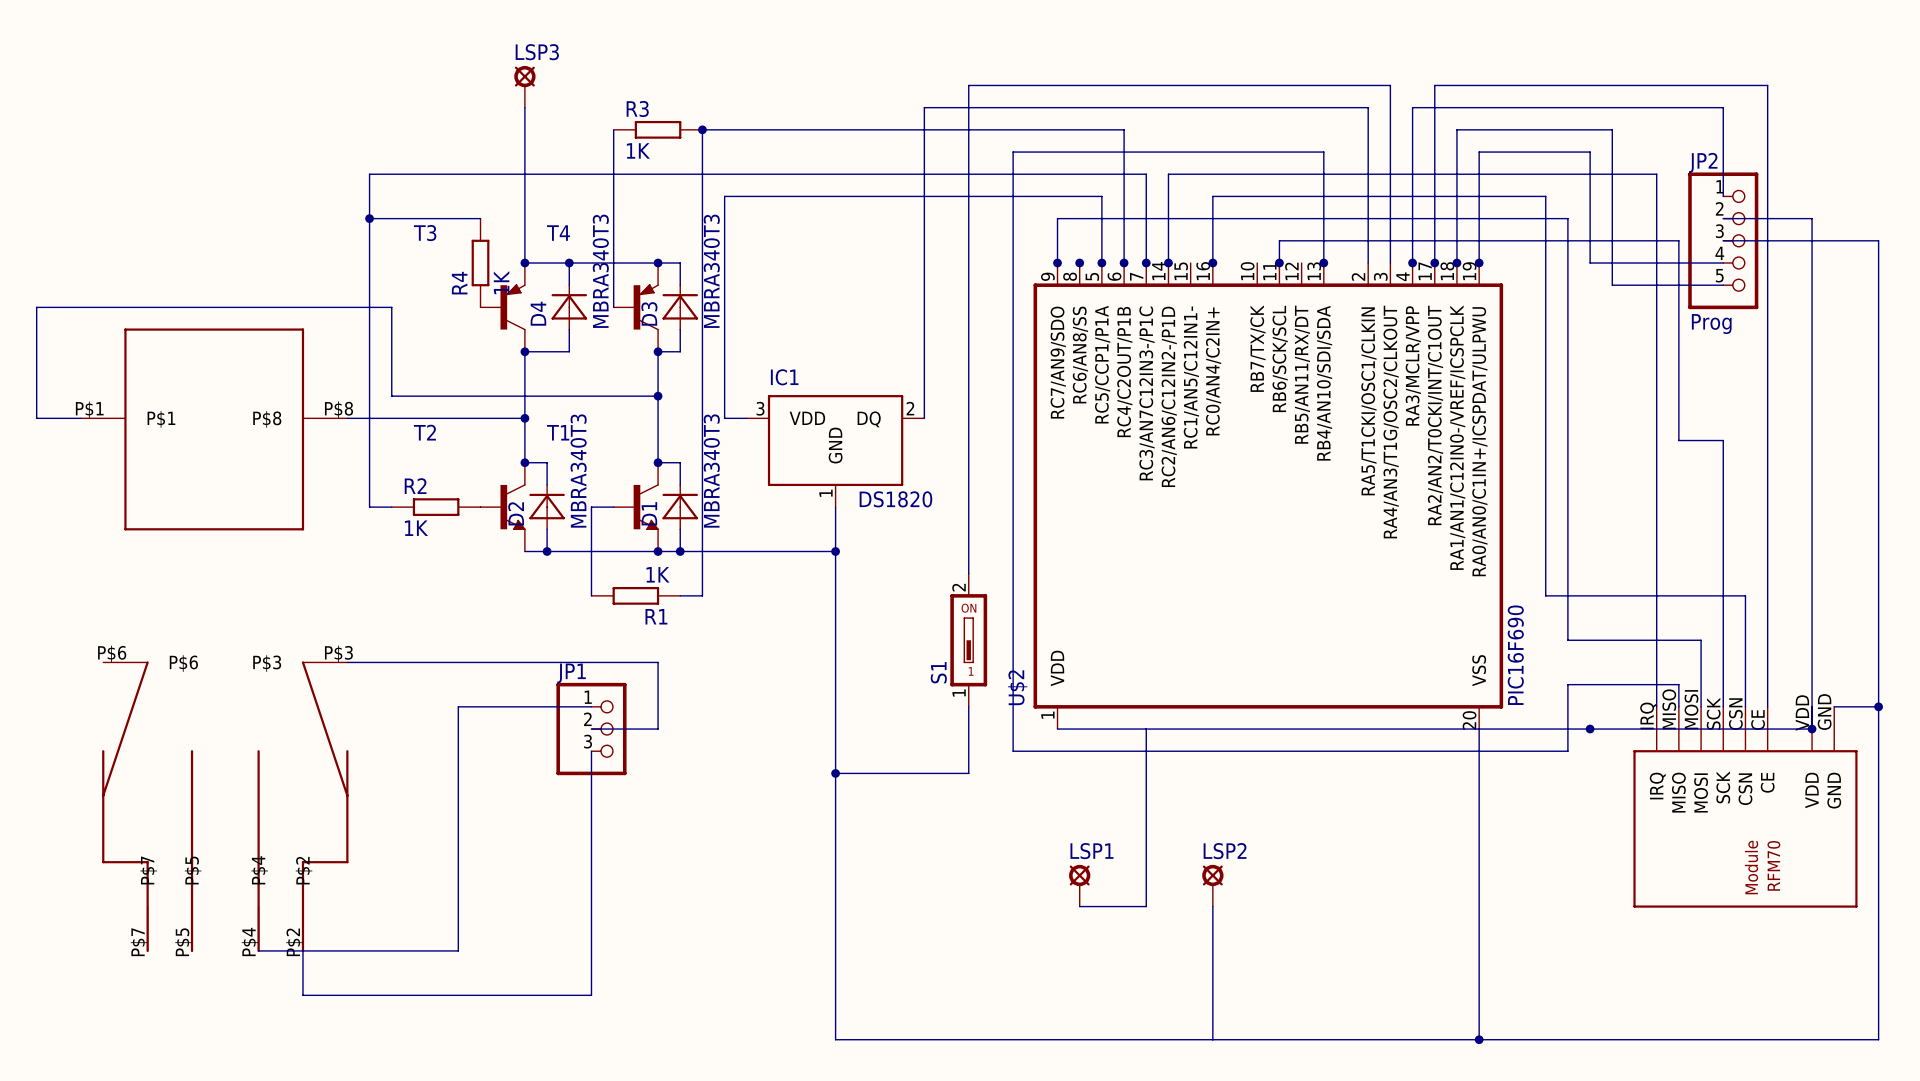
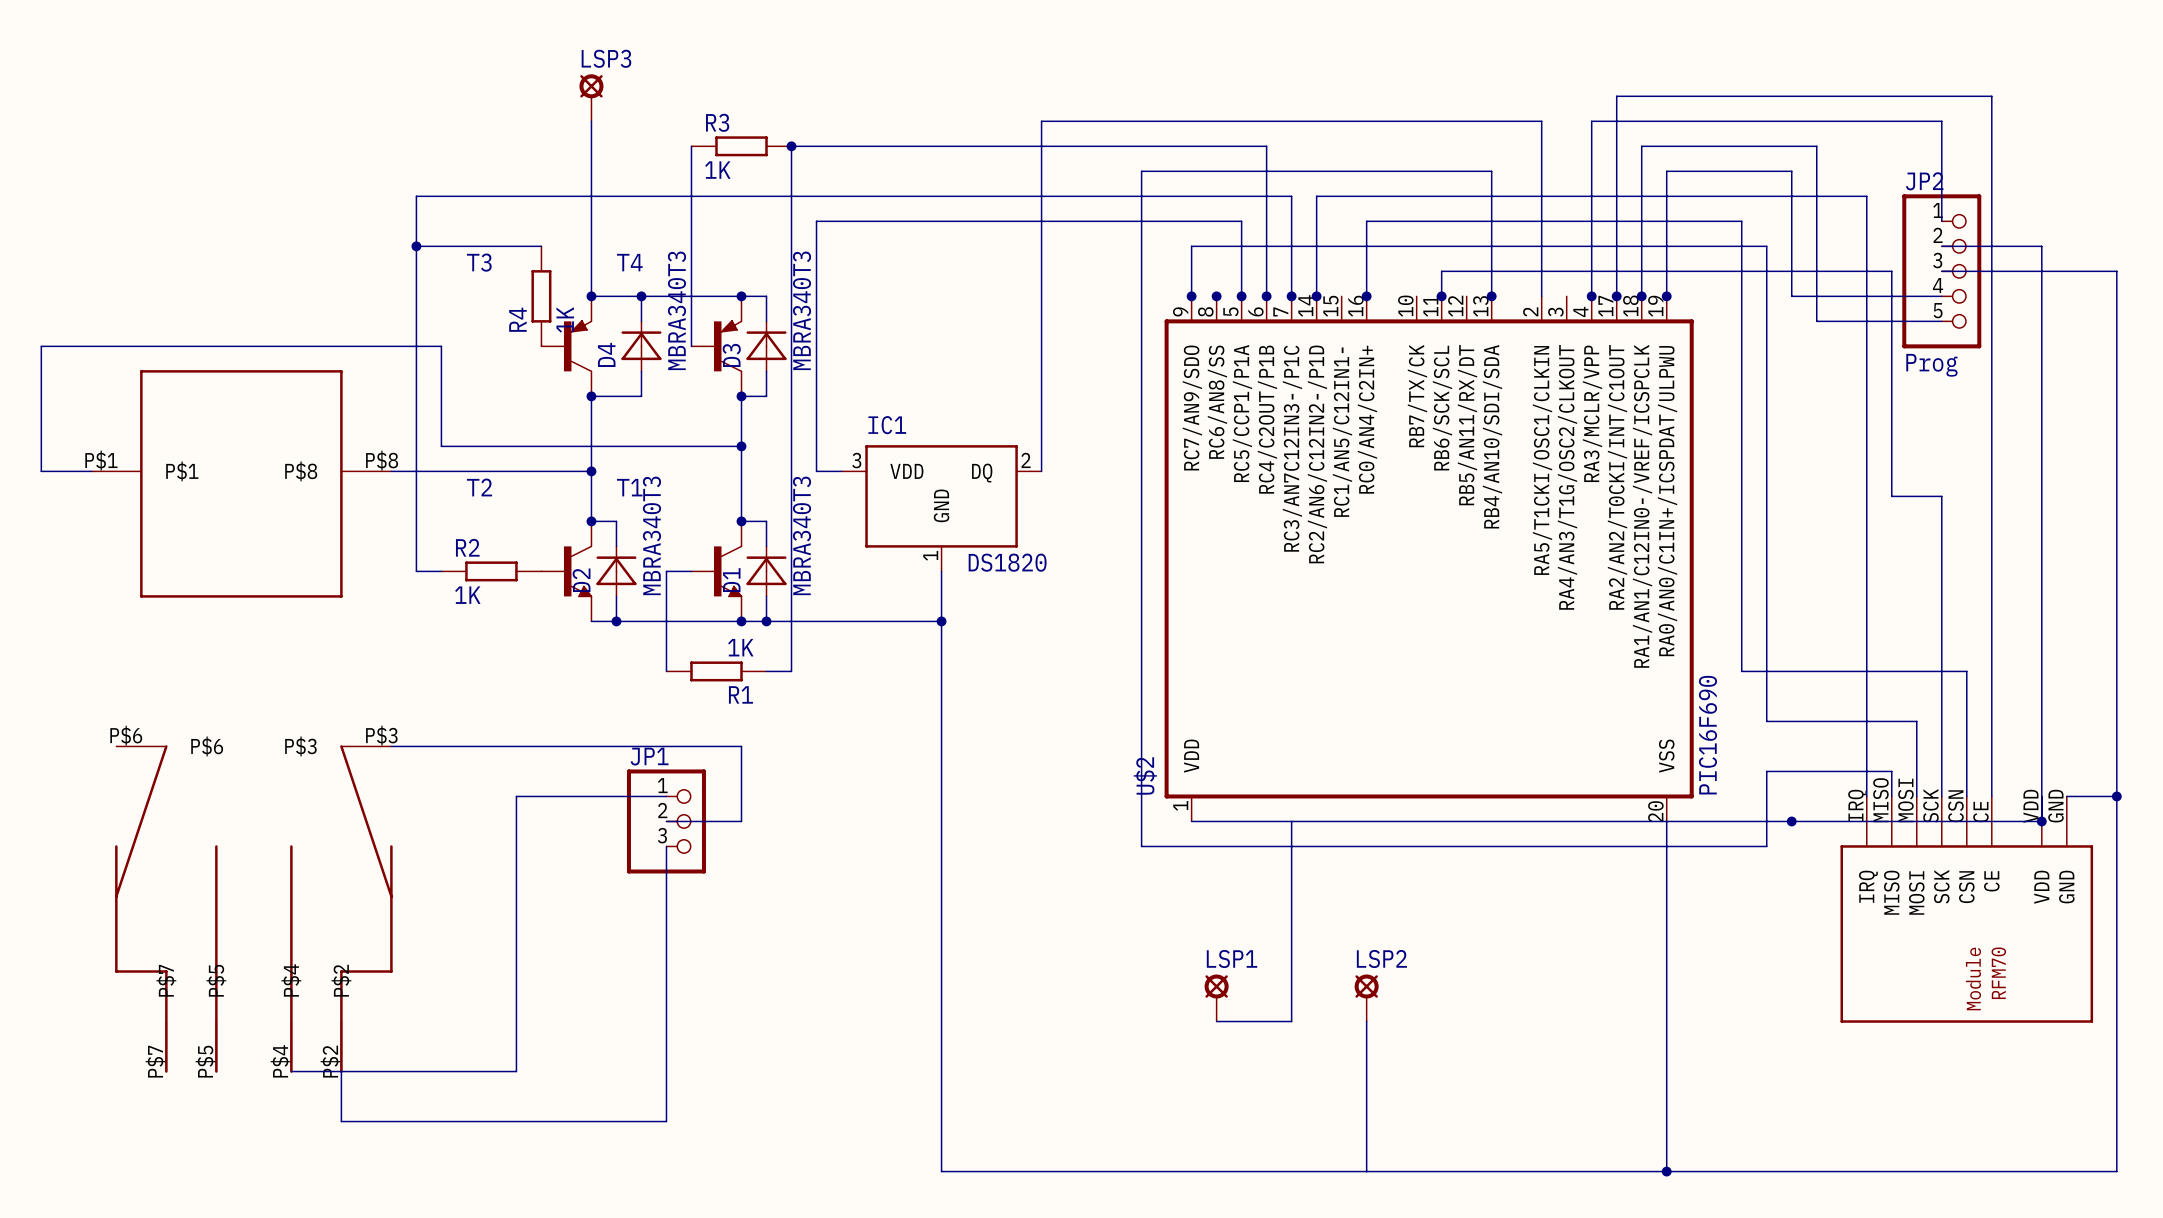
wire: (1390, 263) (1390, 85) (968, 85) (968, 573) -> none
S1: (968, 640) -> none
wire: (968, 706) (968, 773) (835, 773) -> none
junction: (835, 773) -> none

